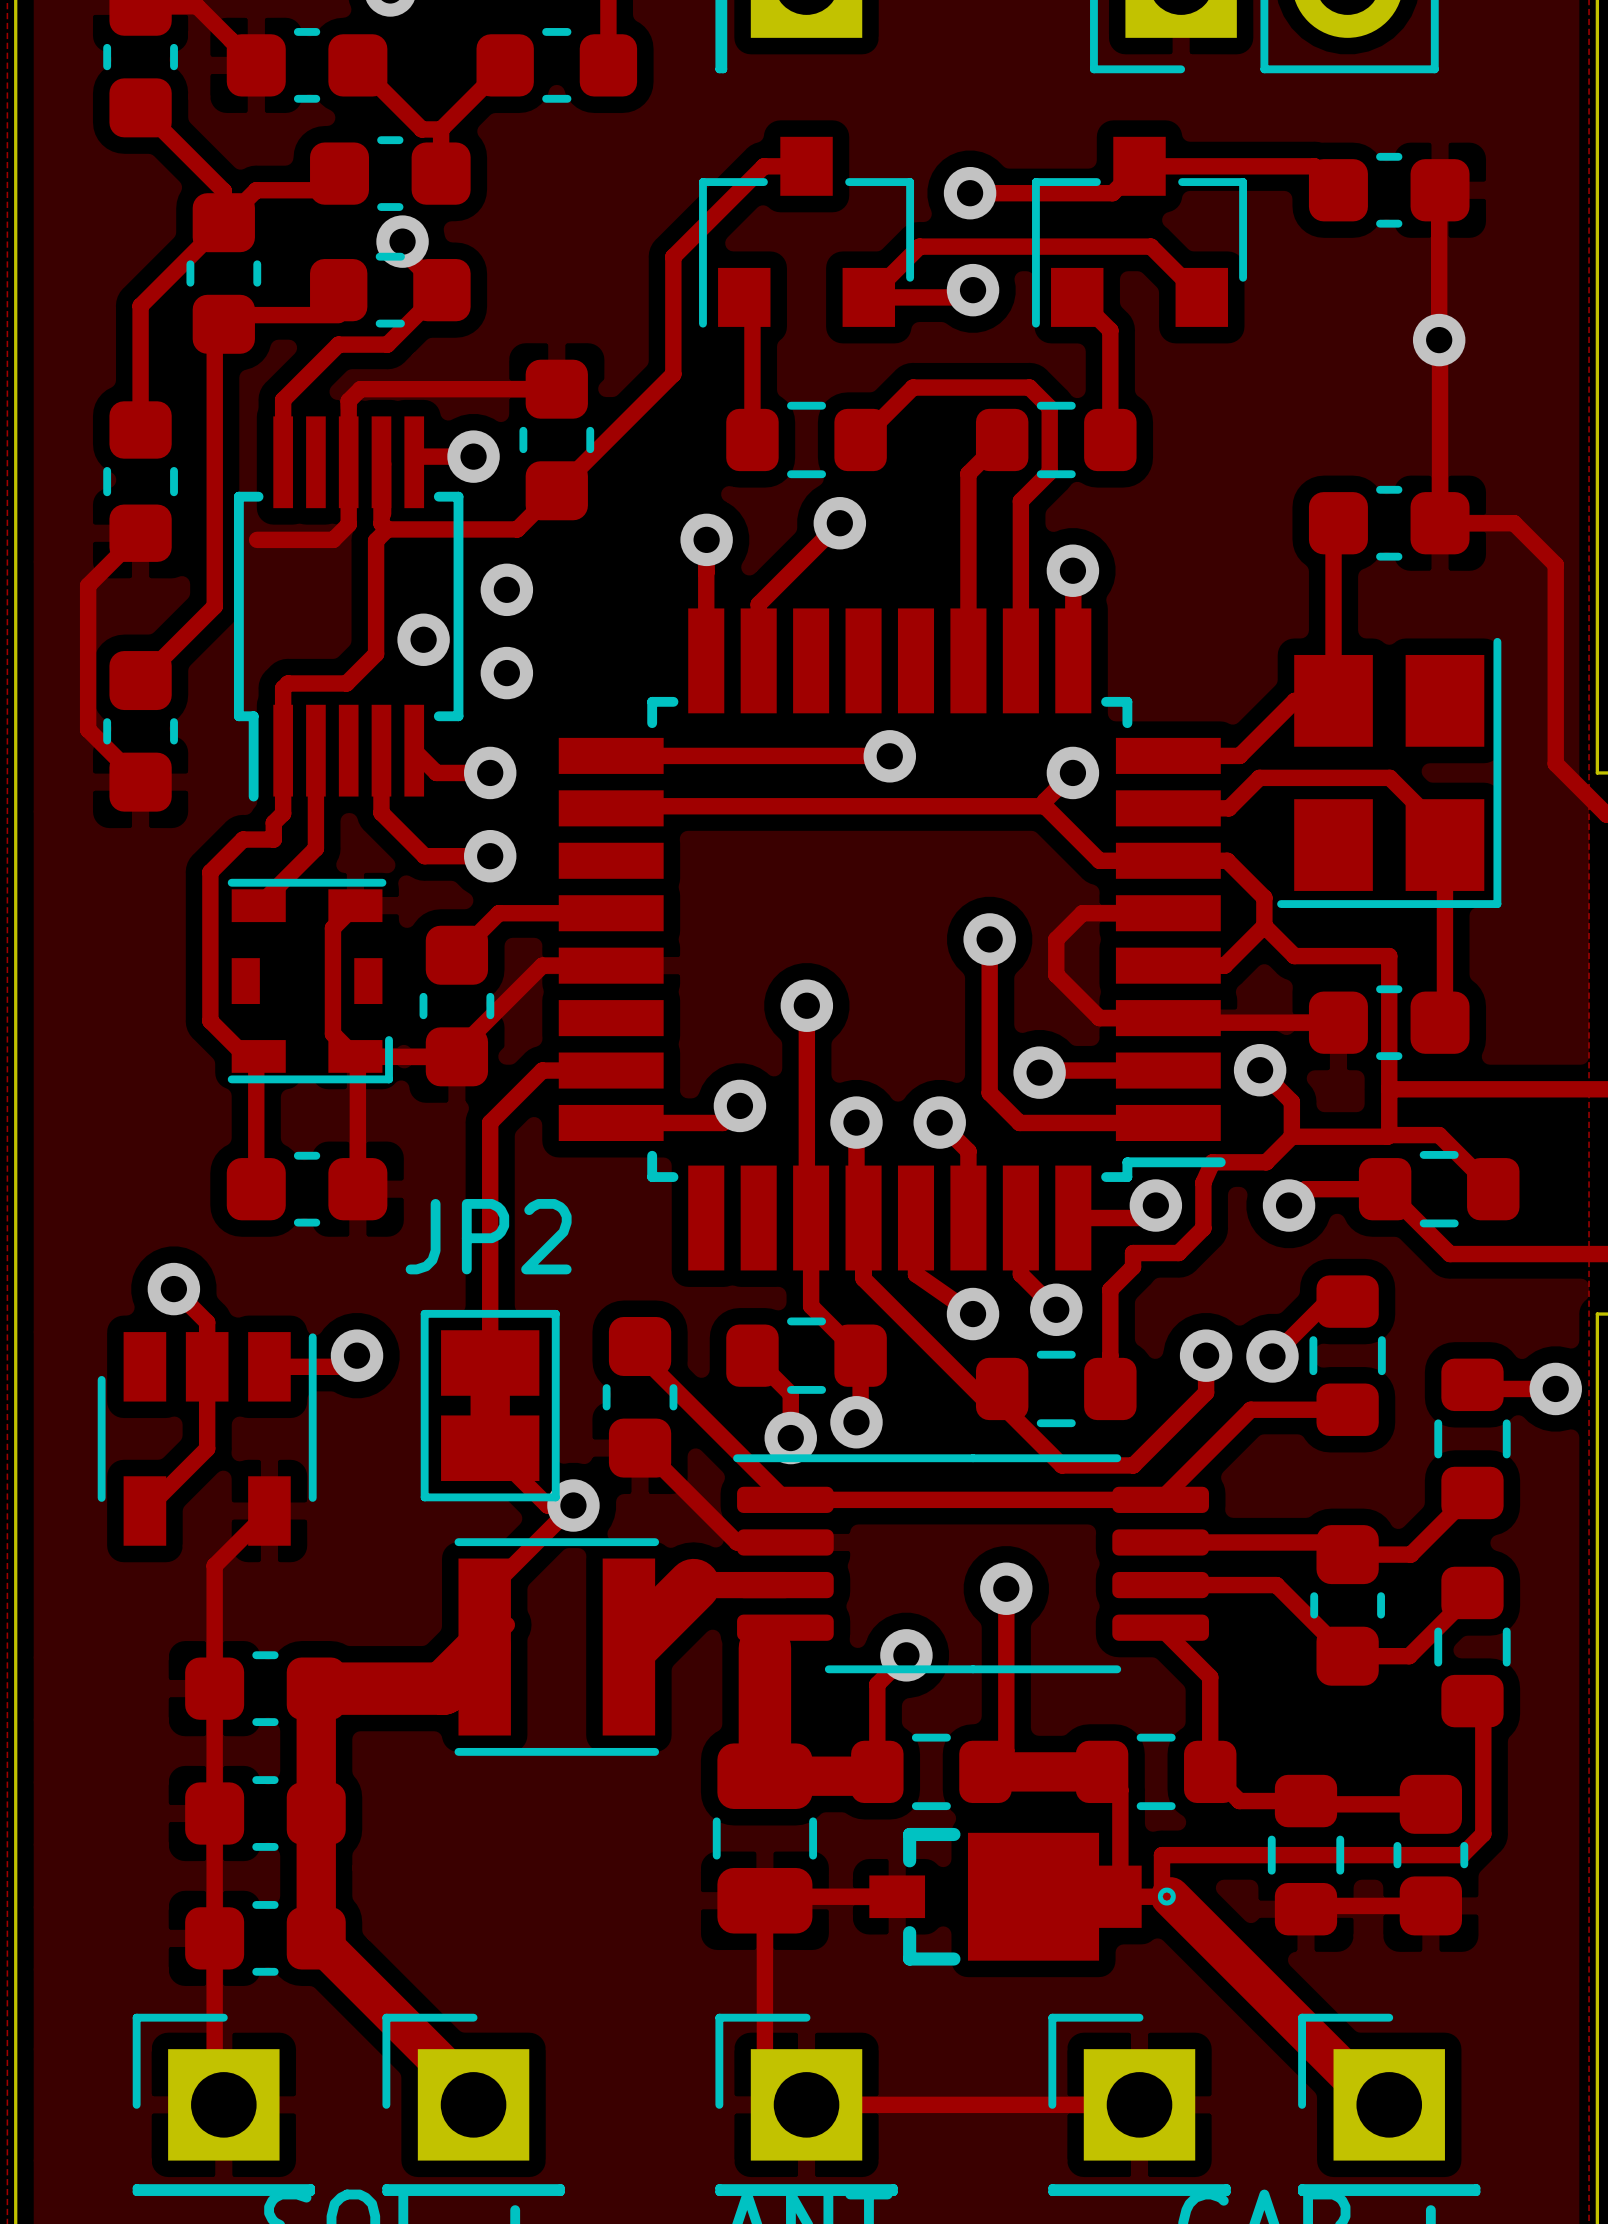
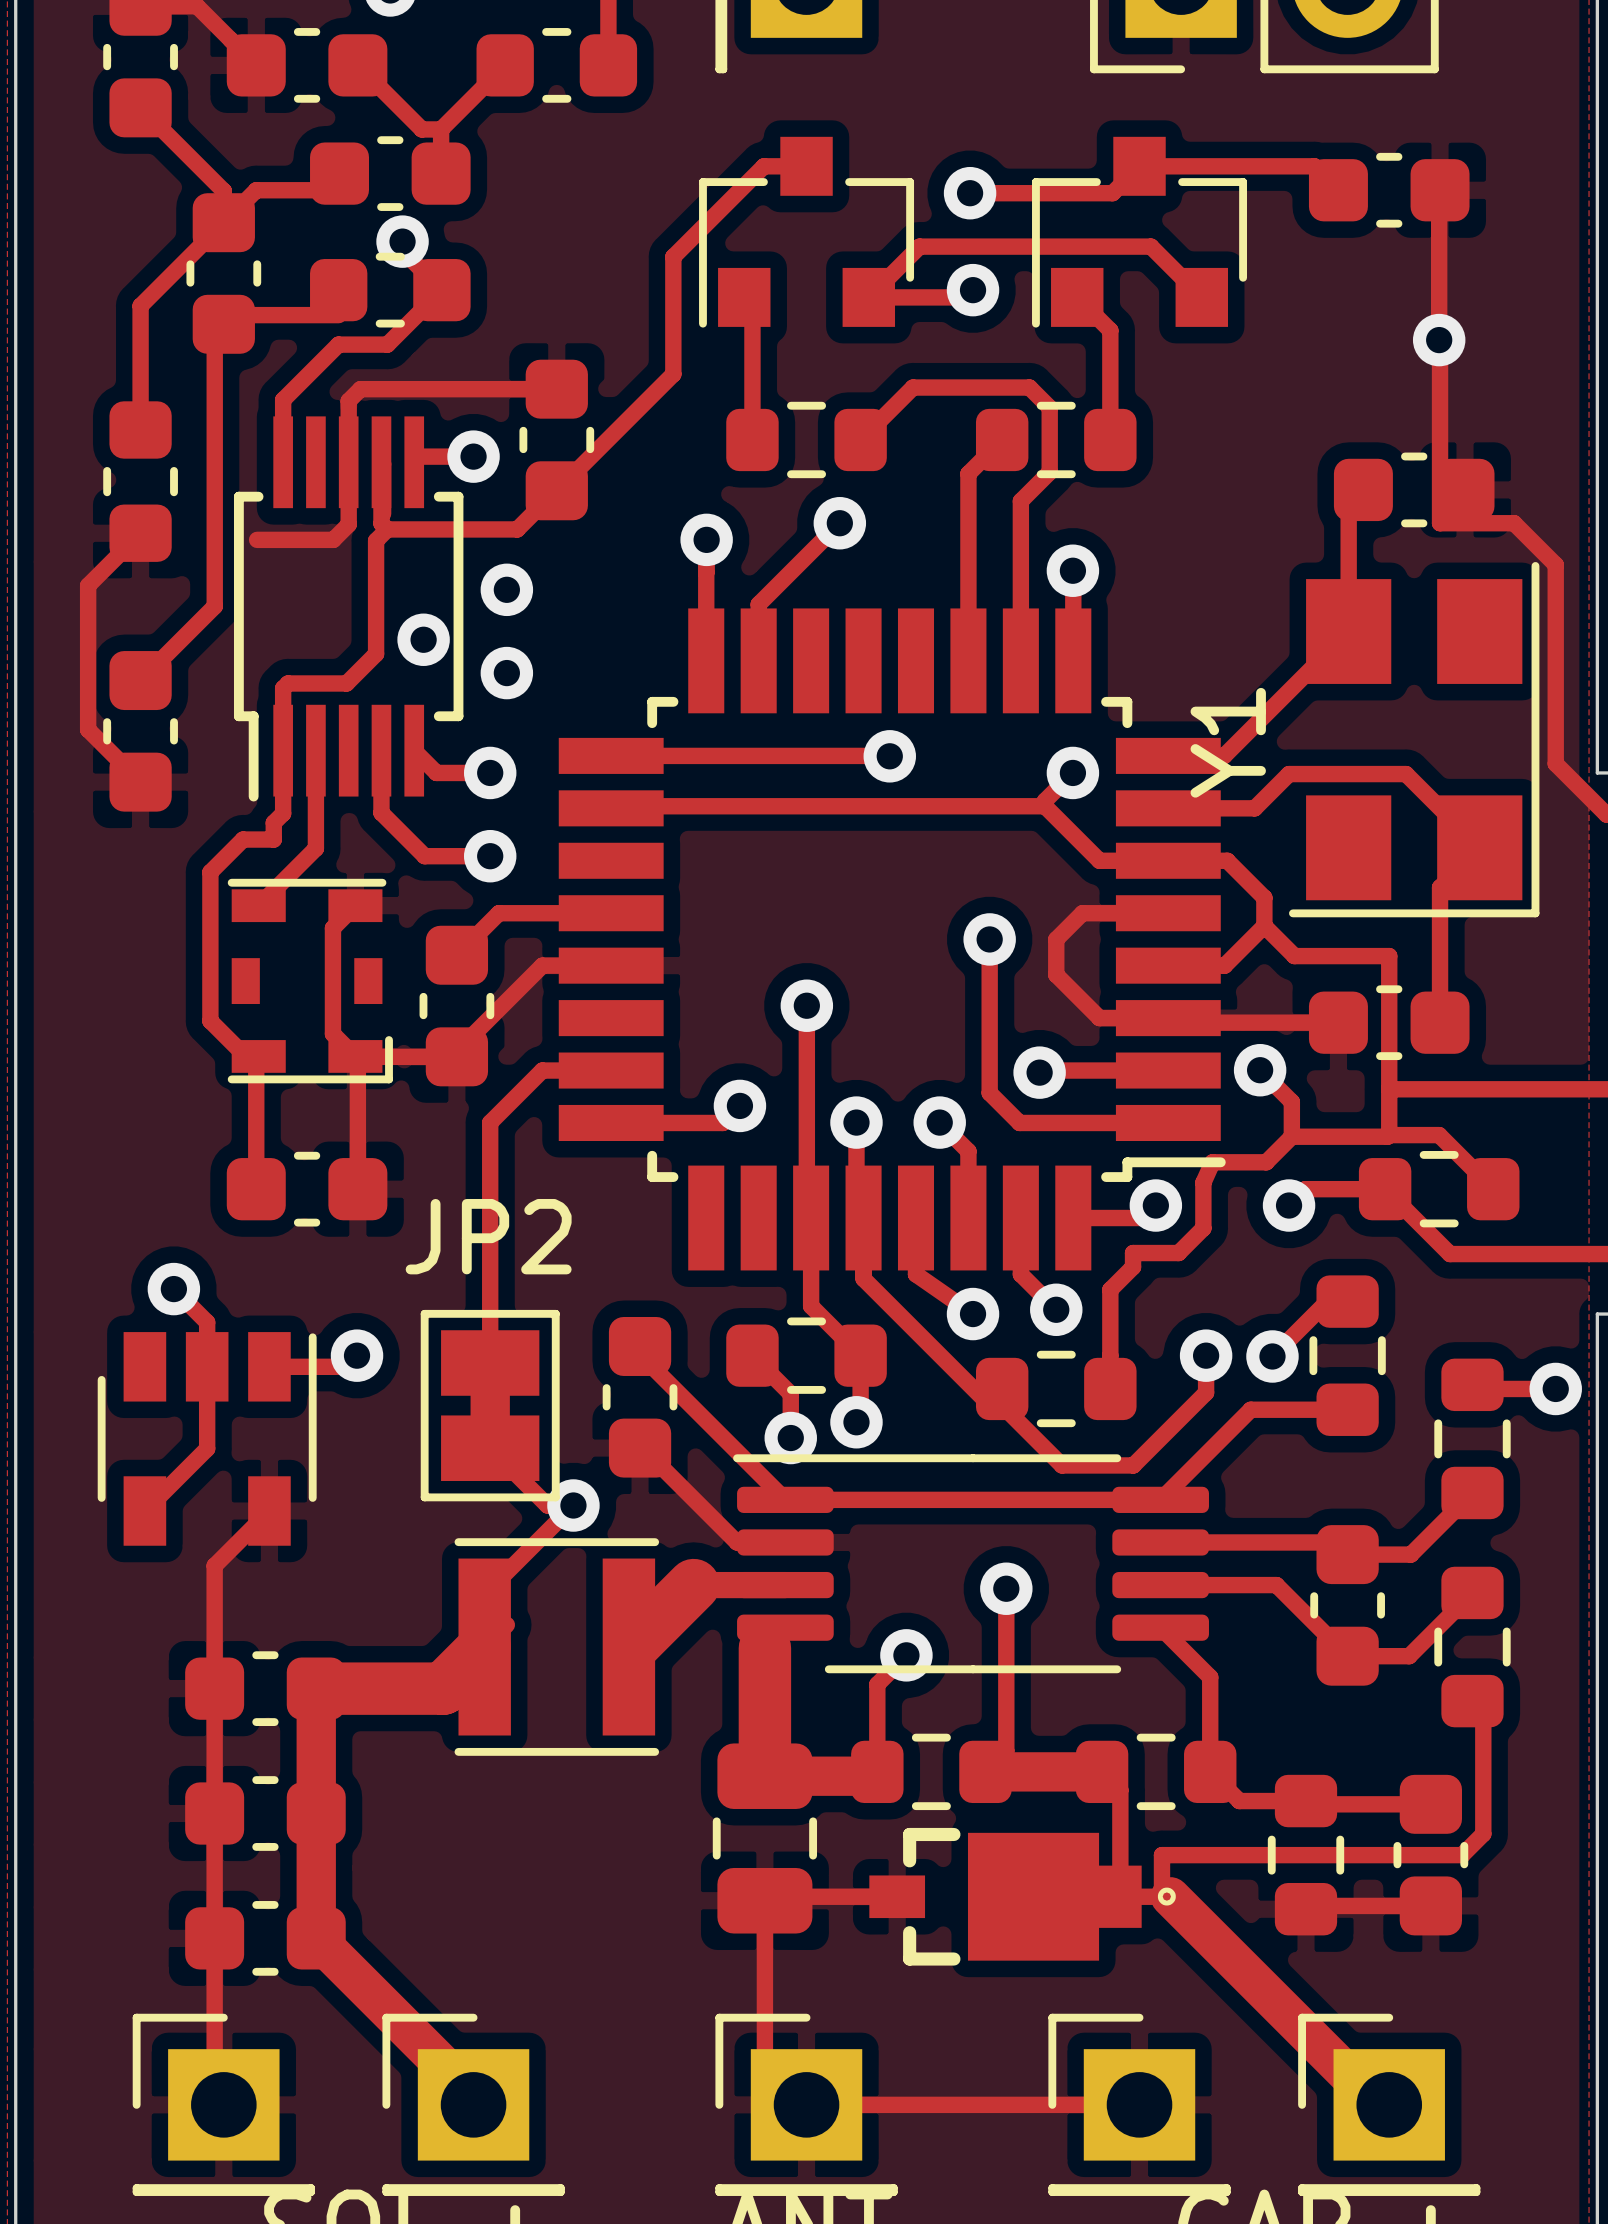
track: (1338, 523) (1333, 528) (1333, 700) (1294, 700) (1239, 755) (1224, 755) -> (1363, 489) (1348, 504) (1348, 631) (1224, 755)
part position: (1389, 523) -> (1414, 489)
Y1: none -> (1414, 739)
part: (1389, 772) -> none
track: (1228, 808) (1259, 777) (1389, 777) (1444, 832) (1444, 1017) (1440, 1022) -> (1228, 808) (1254, 808) (1289, 774) (1406, 774) (1479, 847) (1440, 887) (1440, 1022)

